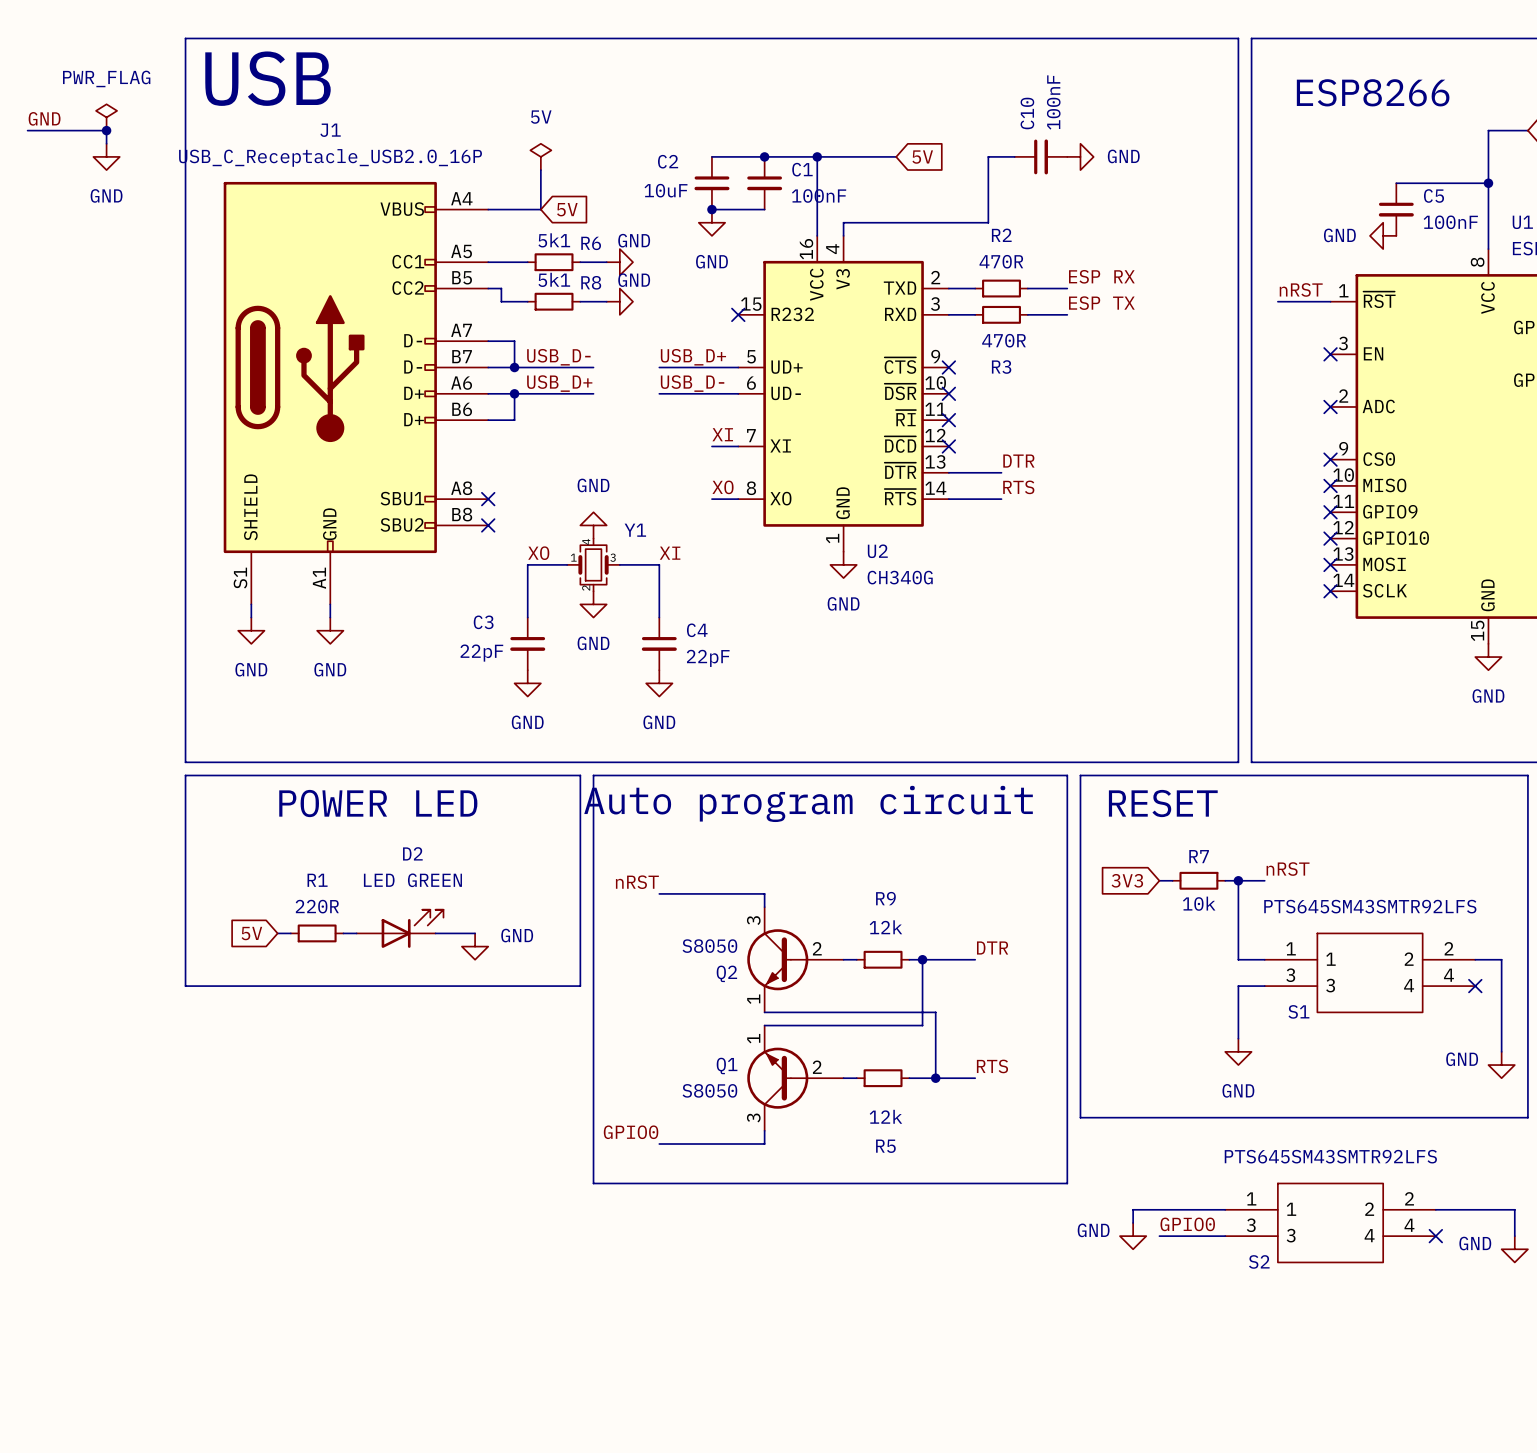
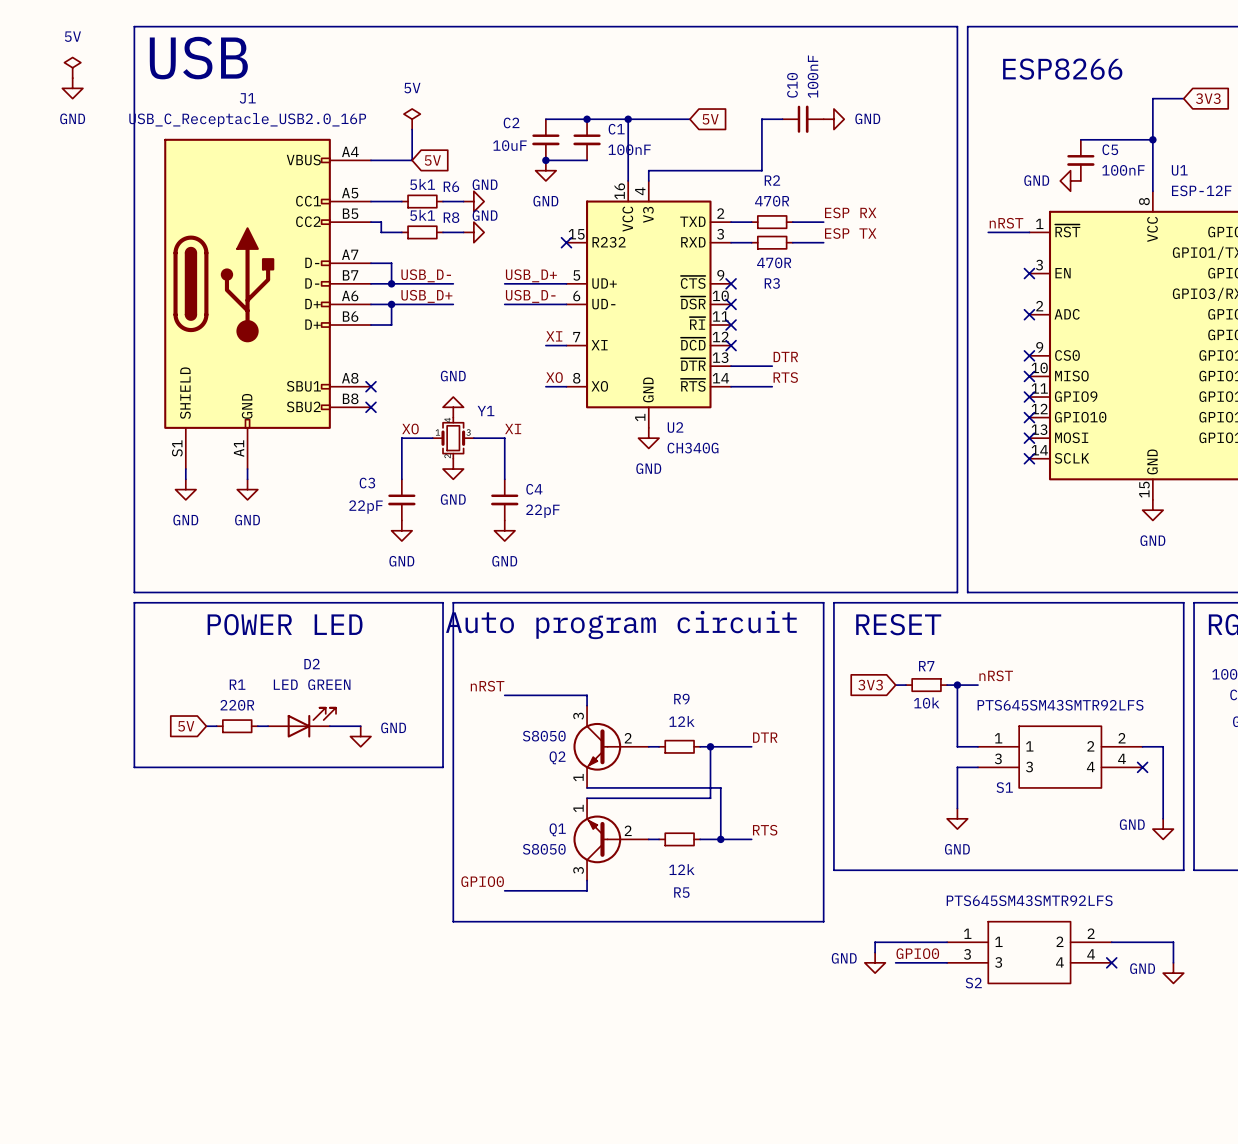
power symbol: none -> 5V (72, 67)
power symbol: PWR_FLAG (106, 117) -> GND (72, 88)
label: GND (44, 118) -> none
wire: (27, 130) (106, 130) (106, 143) -> none
junction: (106, 130) -> none
power symbol: GND (106, 156) -> none

